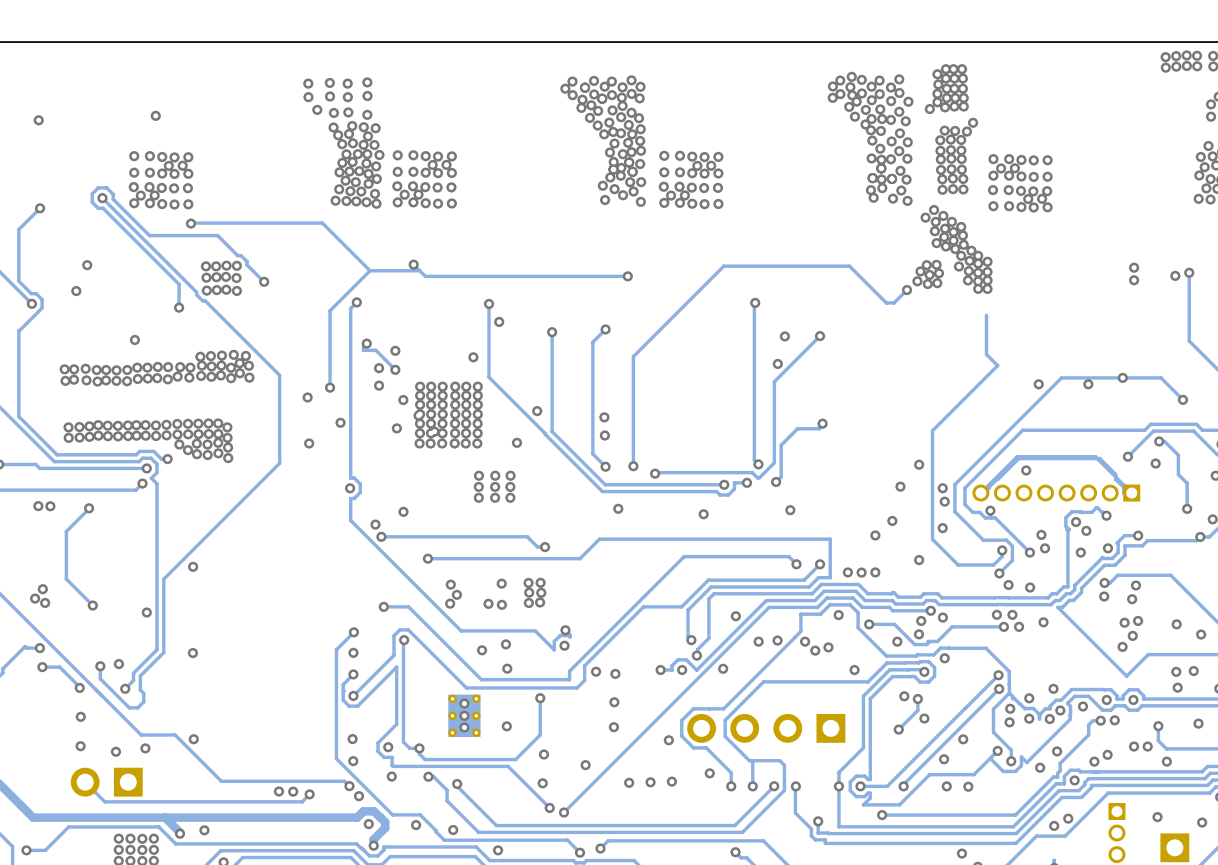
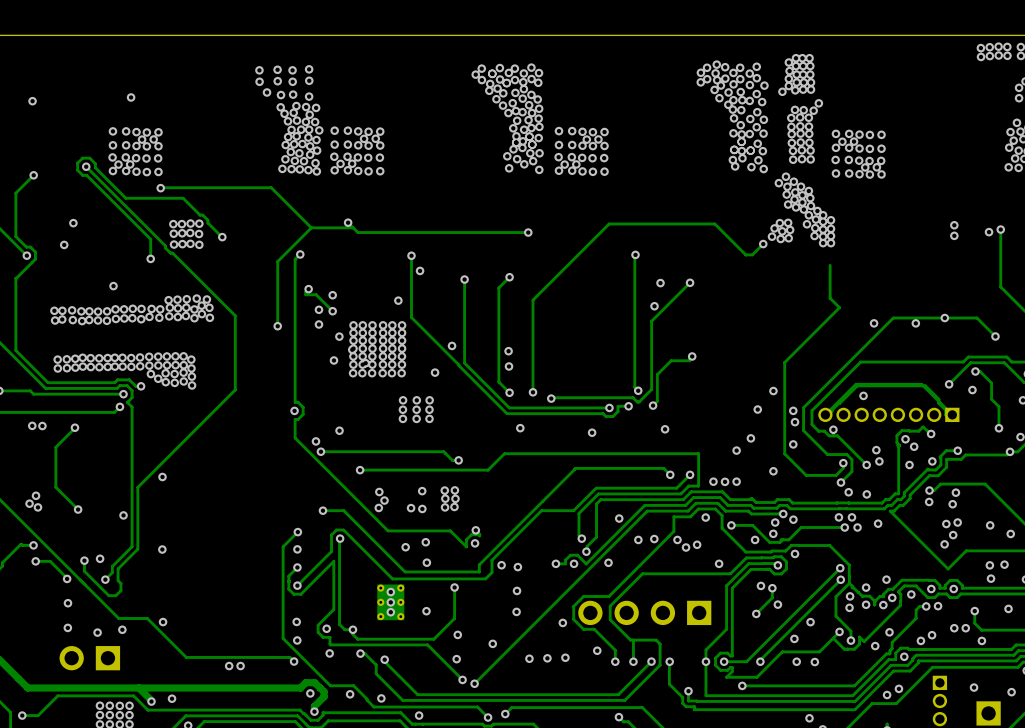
via: (307, 397) -> none
via: (340, 422) -> none
via: (309, 443) -> none
track: (85, 782) (104, 801) (302, 801) (309, 794) -> none
via: none -> (229, 666)
via: (278, 791) -> none
via: none -> (240, 666)
via: (293, 791) -> none
via: (309, 794) -> none
via: (359, 796) -> none

